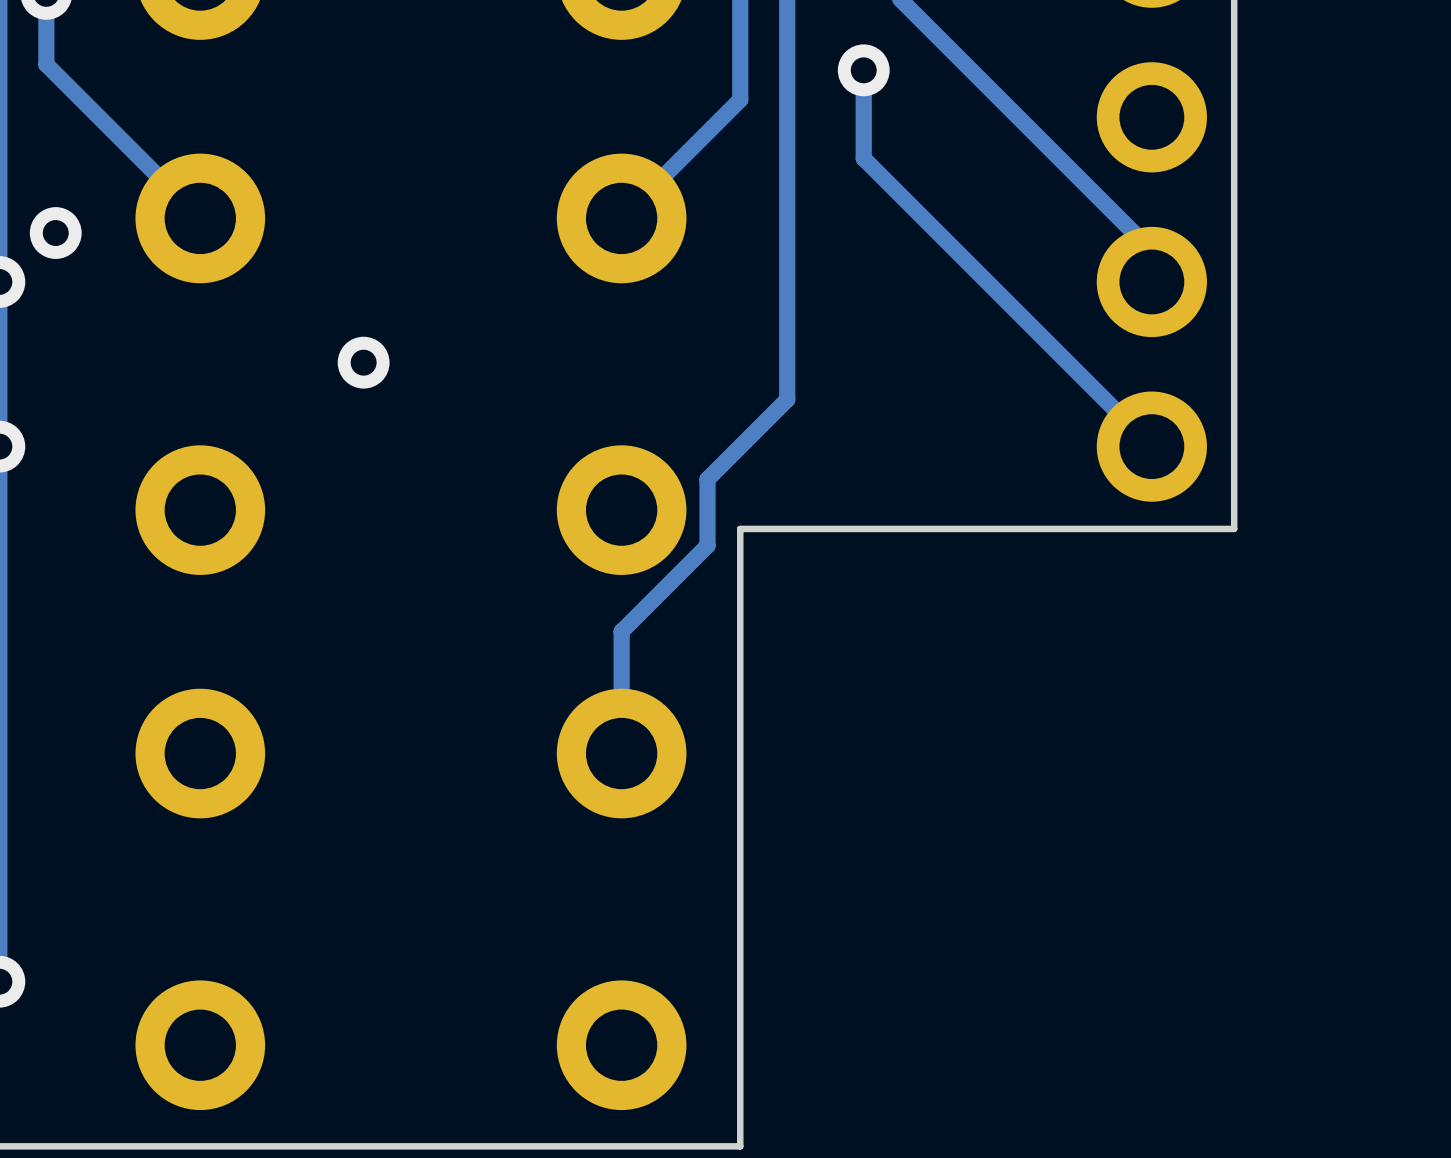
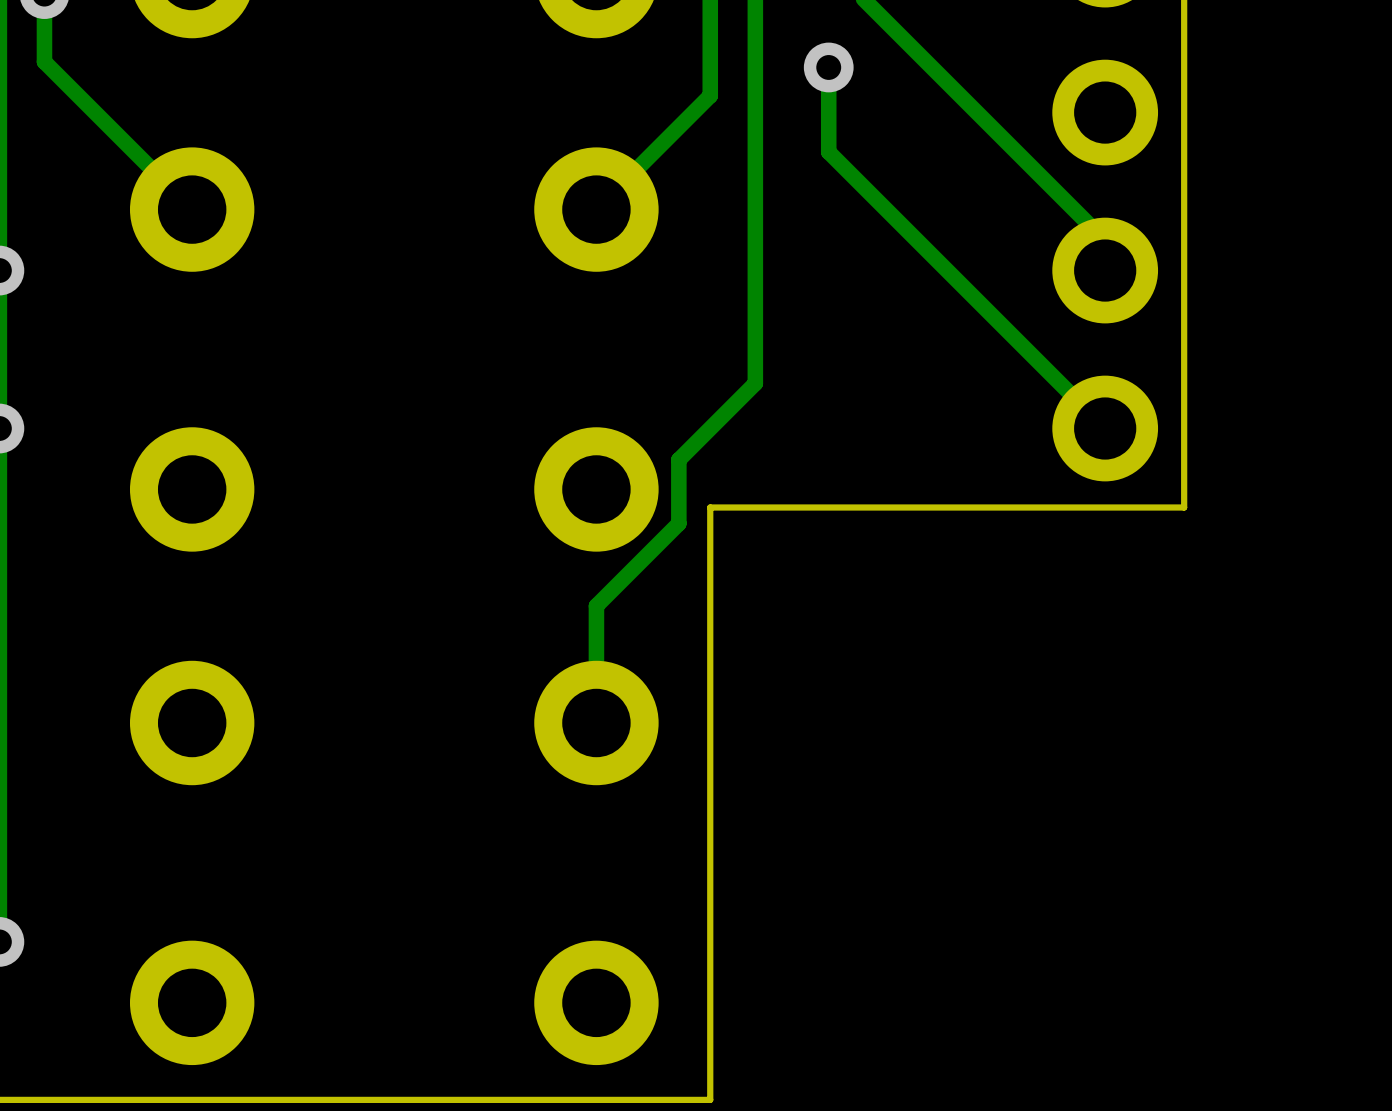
via: (55, 233) -> none
via: (363, 362) -> none

